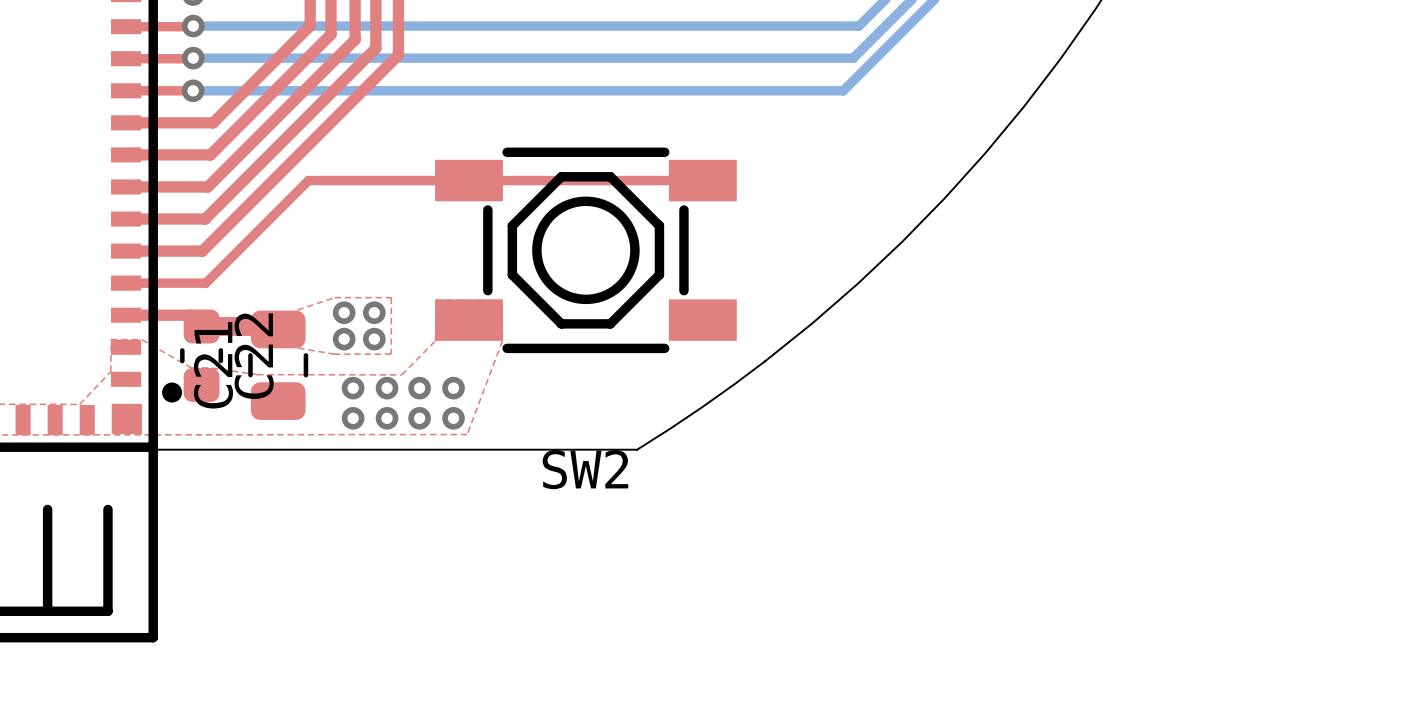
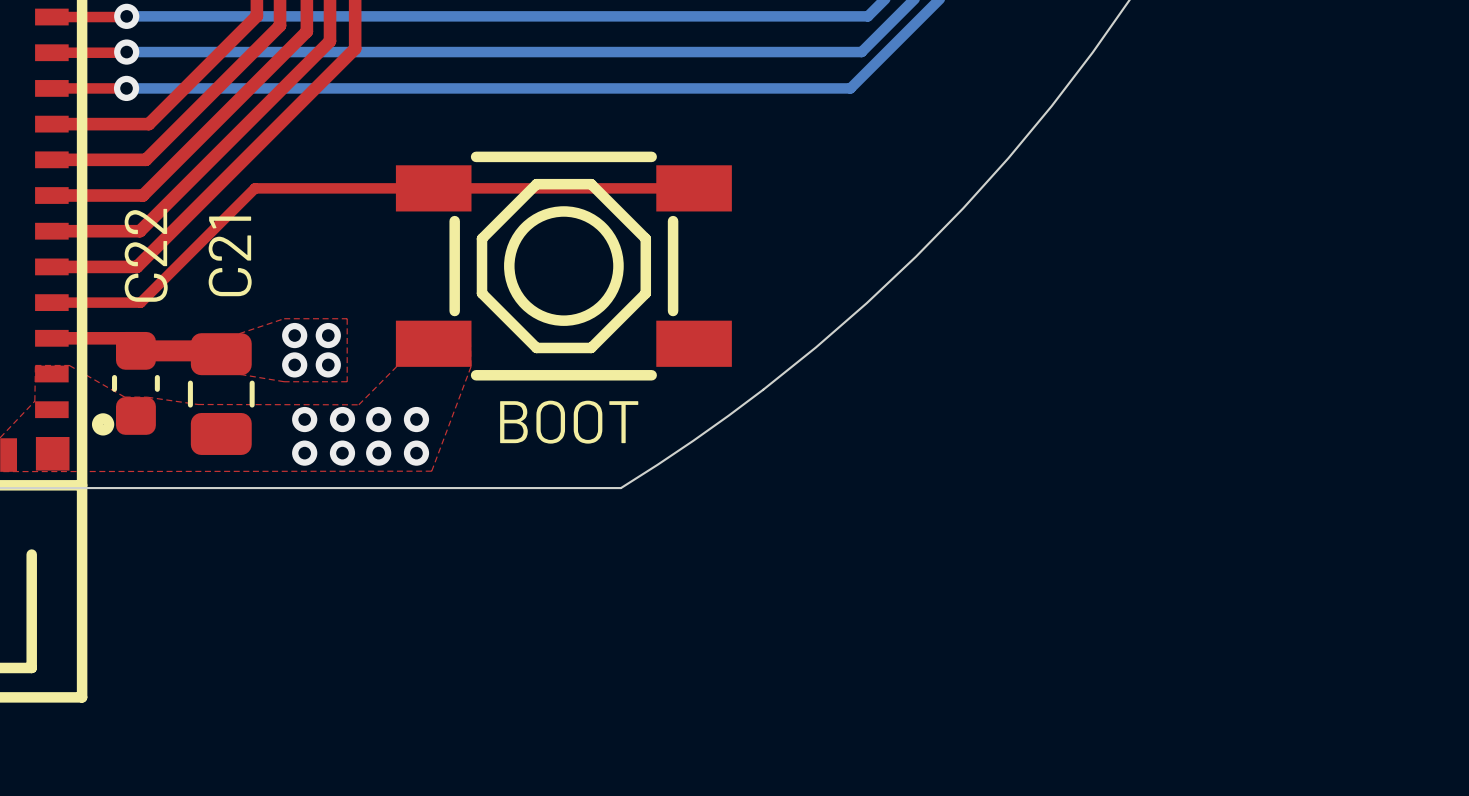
C22 name position: C22 (254, 356) -> C22 (146, 255)
C21 name position: C21 (213, 365) -> C21 (230, 256)
SW2 name: SW2 (585, 469) -> BOOT (569, 422)

